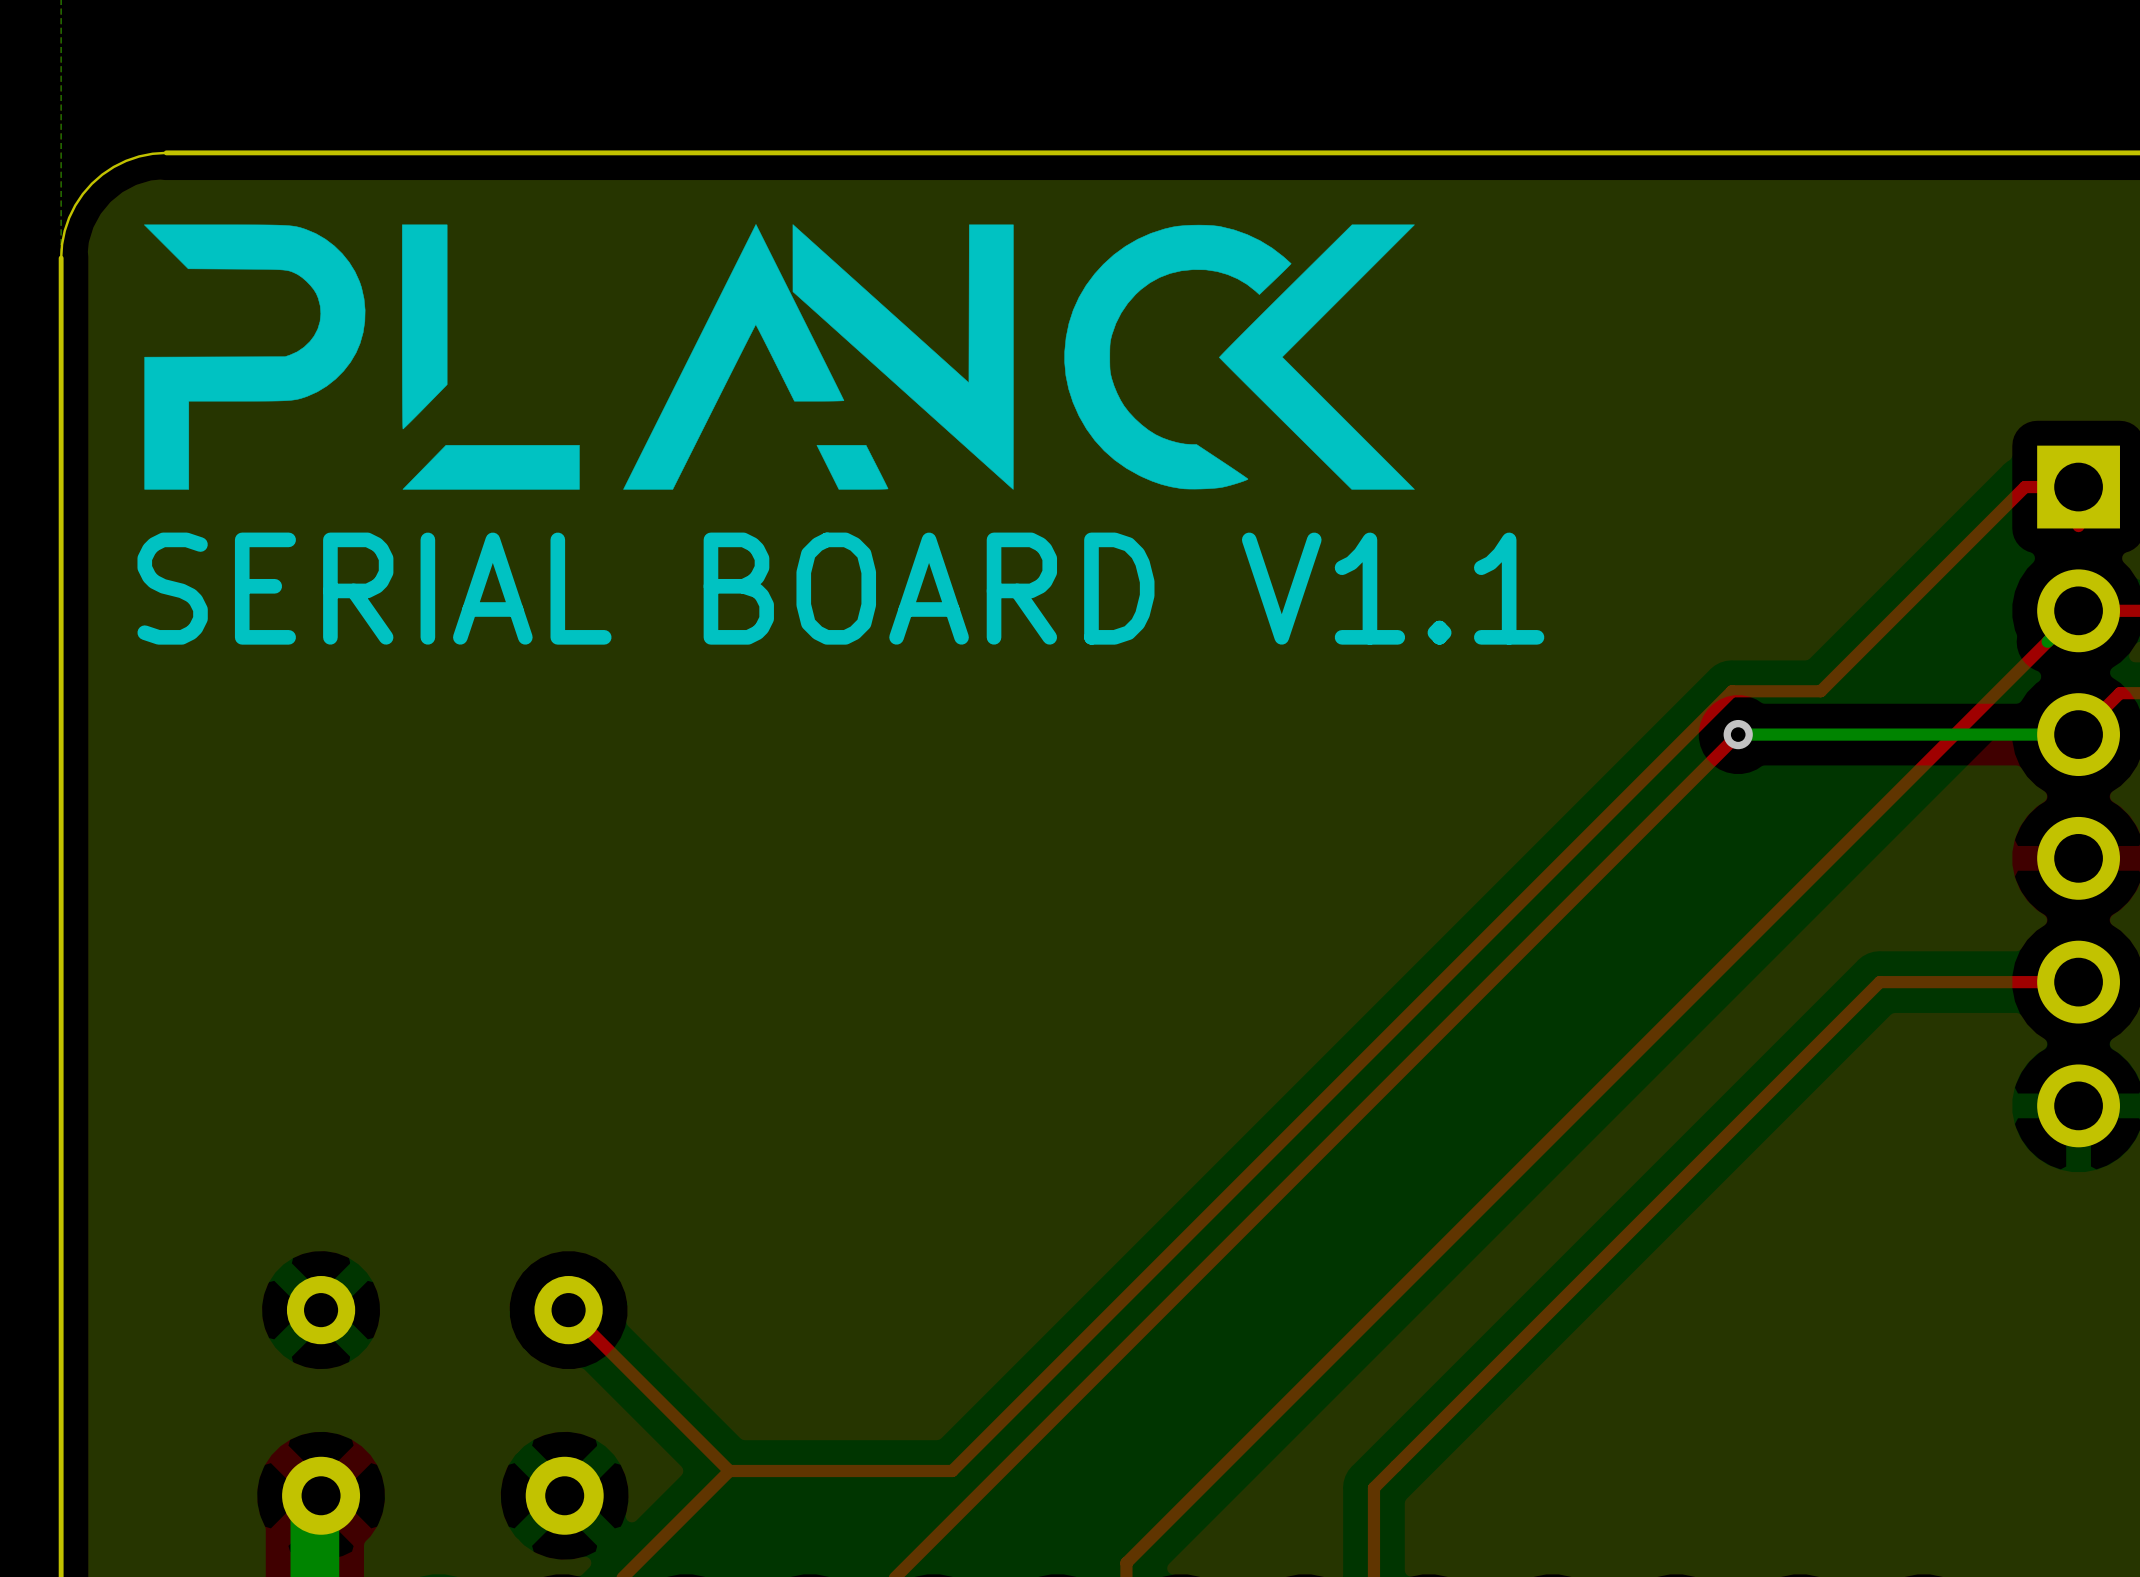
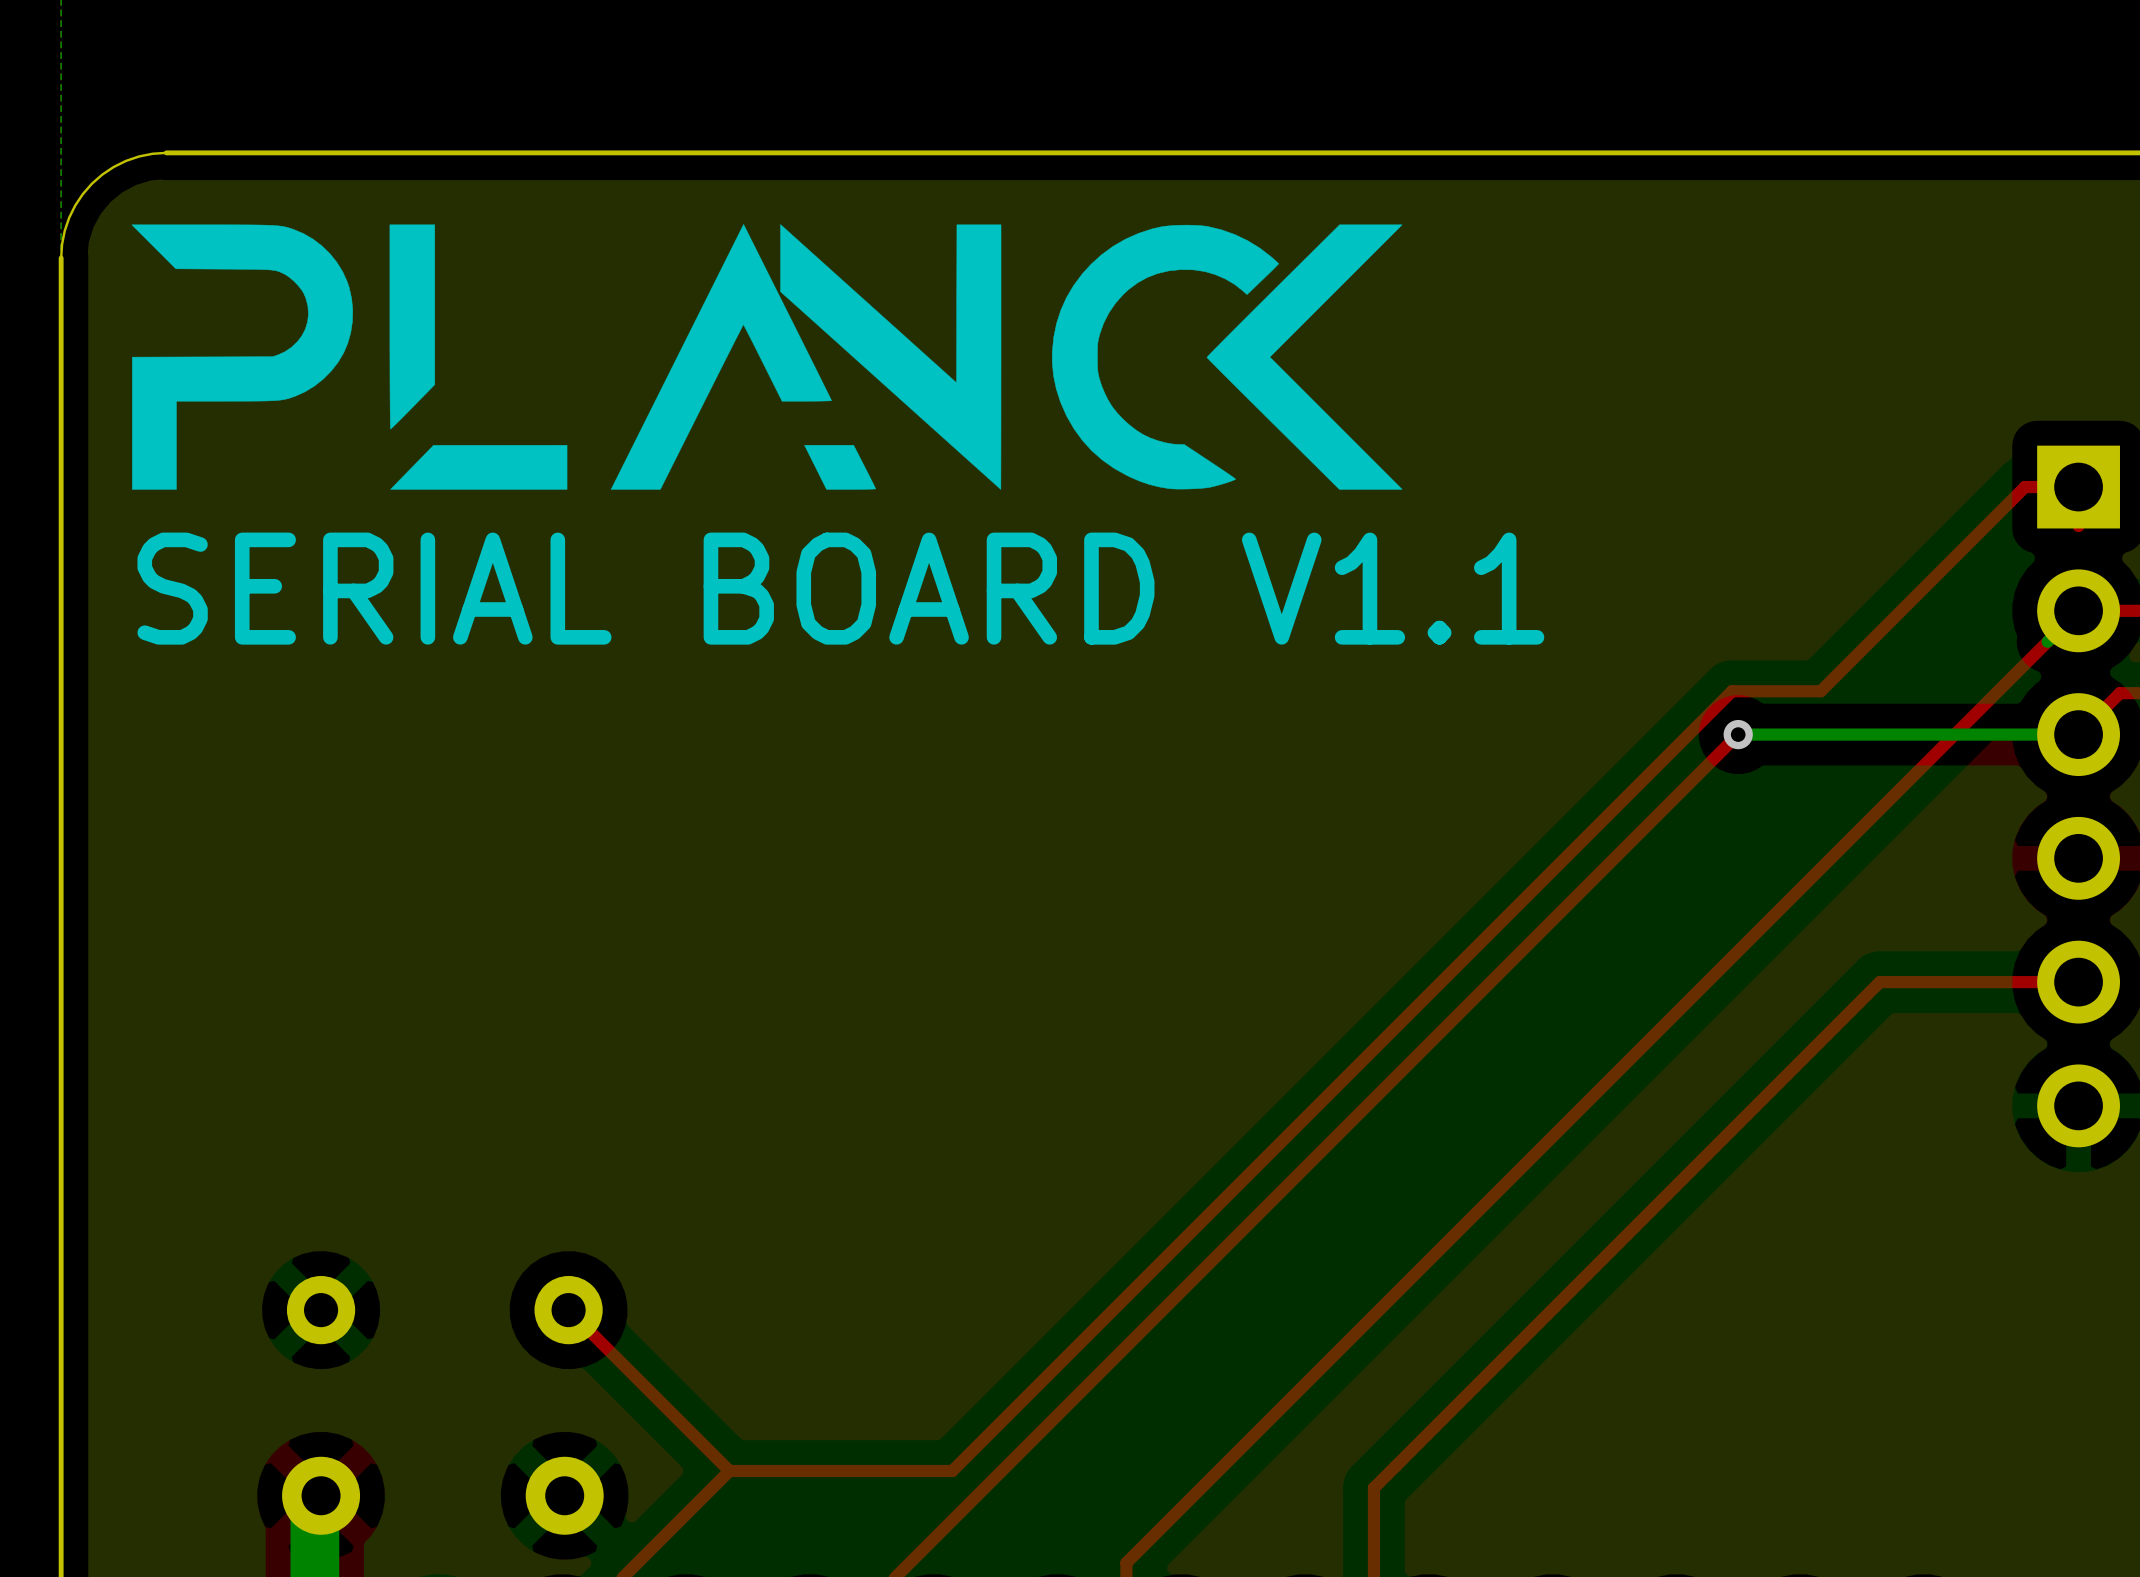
drawing position: (779, 356) -> (767, 356)

